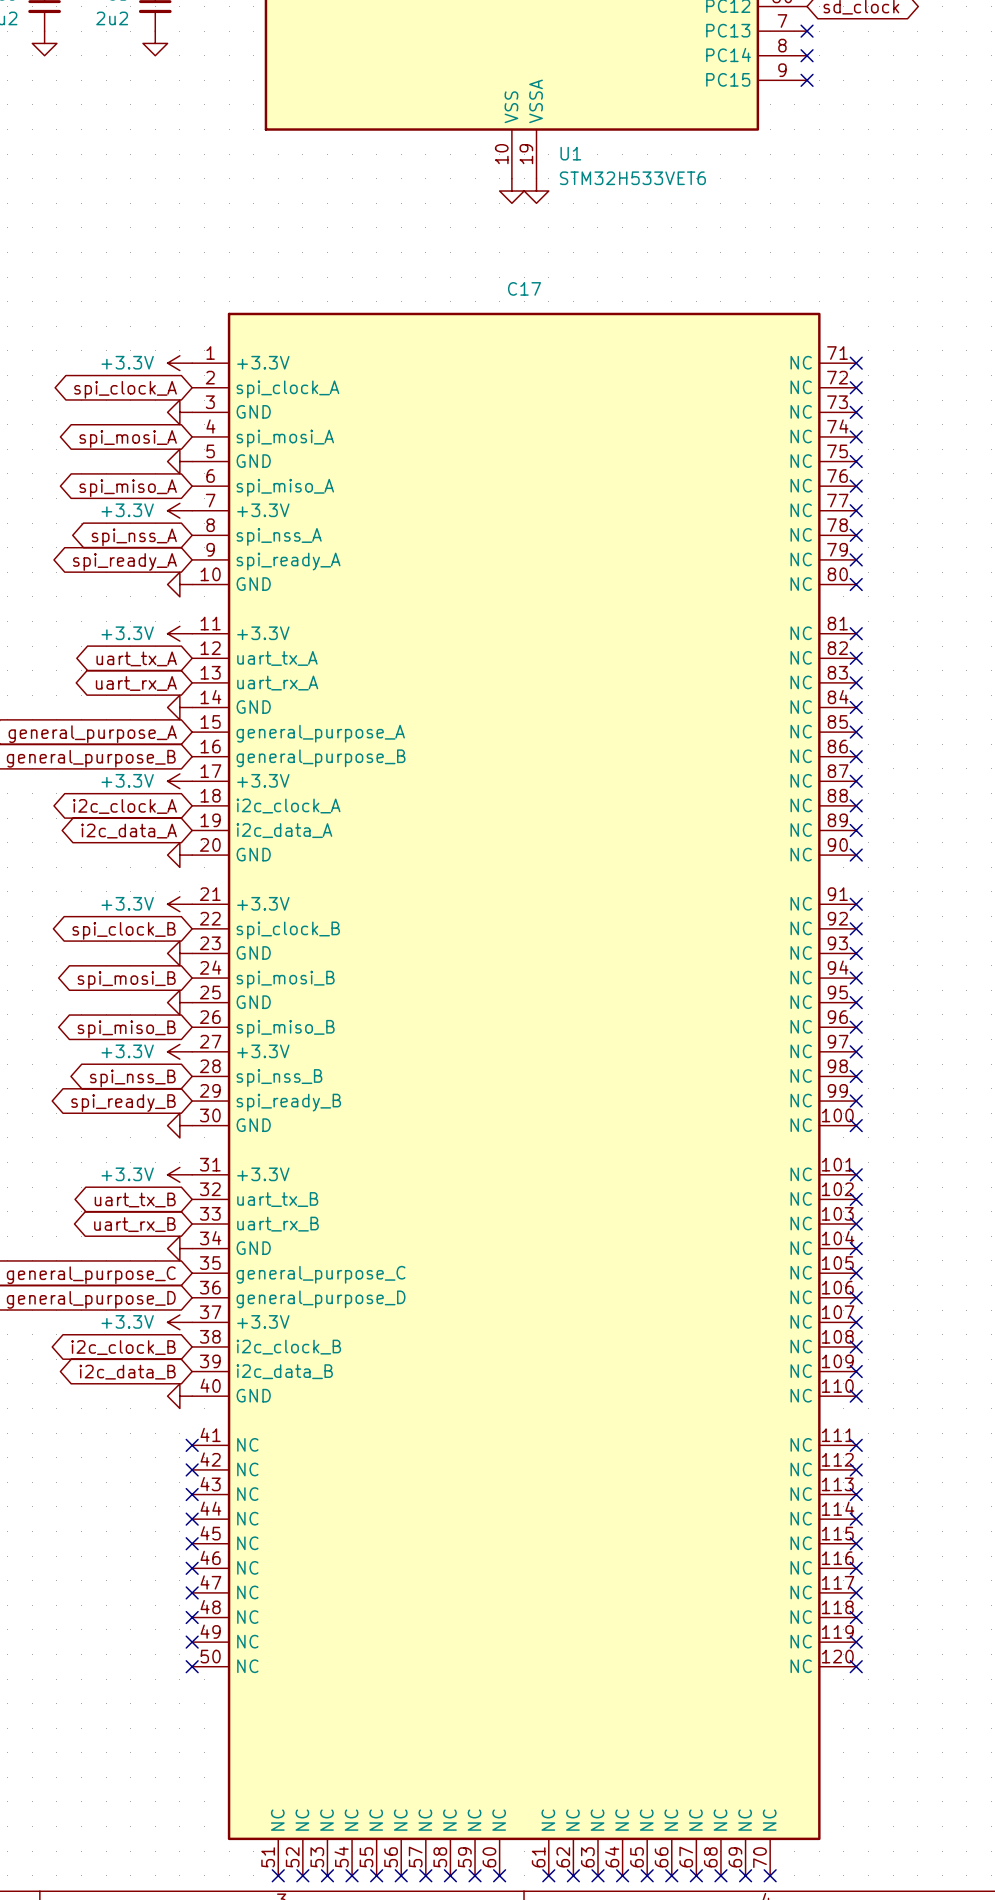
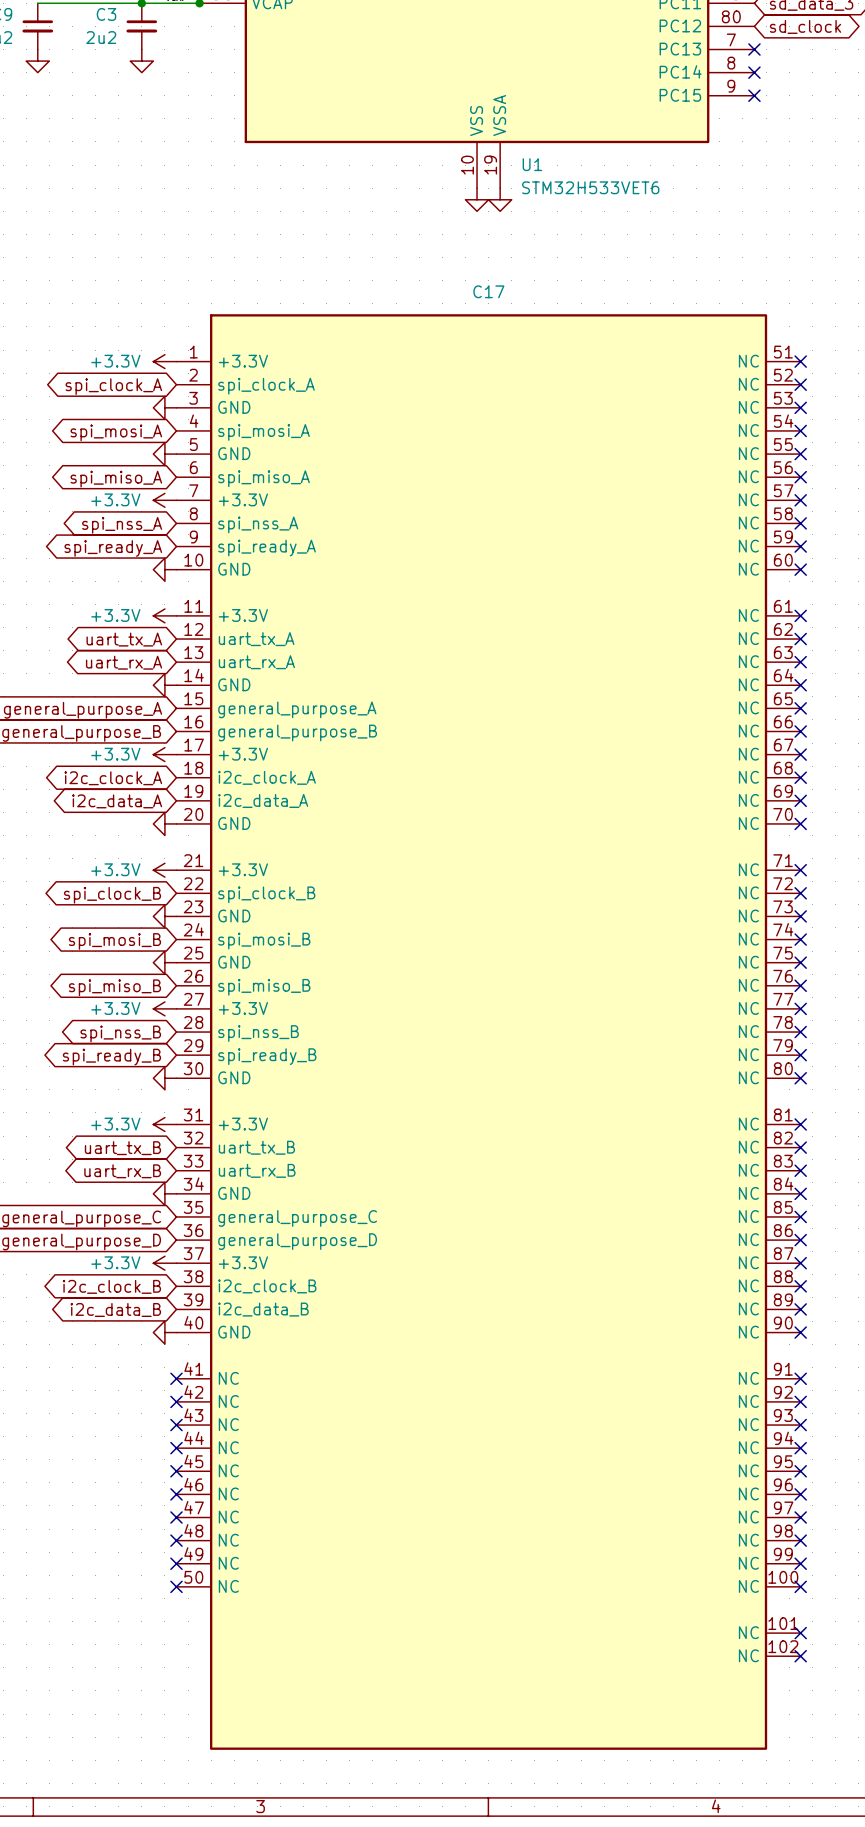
C17 symbol: [192, 312, 857, 1876] -> [176, 314, 801, 1750]
no-connect mark: none -> (800, 1633)
no-connect mark: none -> (800, 1656)
no-connect mark: (278, 1875) -> none
no-connect mark: (302, 1875) -> none
no-connect mark: (327, 1875) -> none
no-connect mark: (352, 1875) -> none
no-connect mark: (376, 1875) -> none
no-connect mark: (401, 1875) -> none
no-connect mark: (425, 1875) -> none
no-connect mark: (450, 1875) -> none
no-connect mark: (475, 1875) -> none
no-connect mark: (499, 1875) -> none
no-connect mark: (548, 1875) -> none
no-connect mark: (573, 1875) -> none
no-connect mark: (597, 1875) -> none
no-connect mark: (622, 1875) -> none
no-connect mark: (647, 1875) -> none
no-connect mark: (671, 1875) -> none
no-connect mark: (696, 1875) -> none
no-connect mark: (720, 1875) -> none
no-connect mark: (745, 1875) -> none
no-connect mark: (770, 1875) -> none

